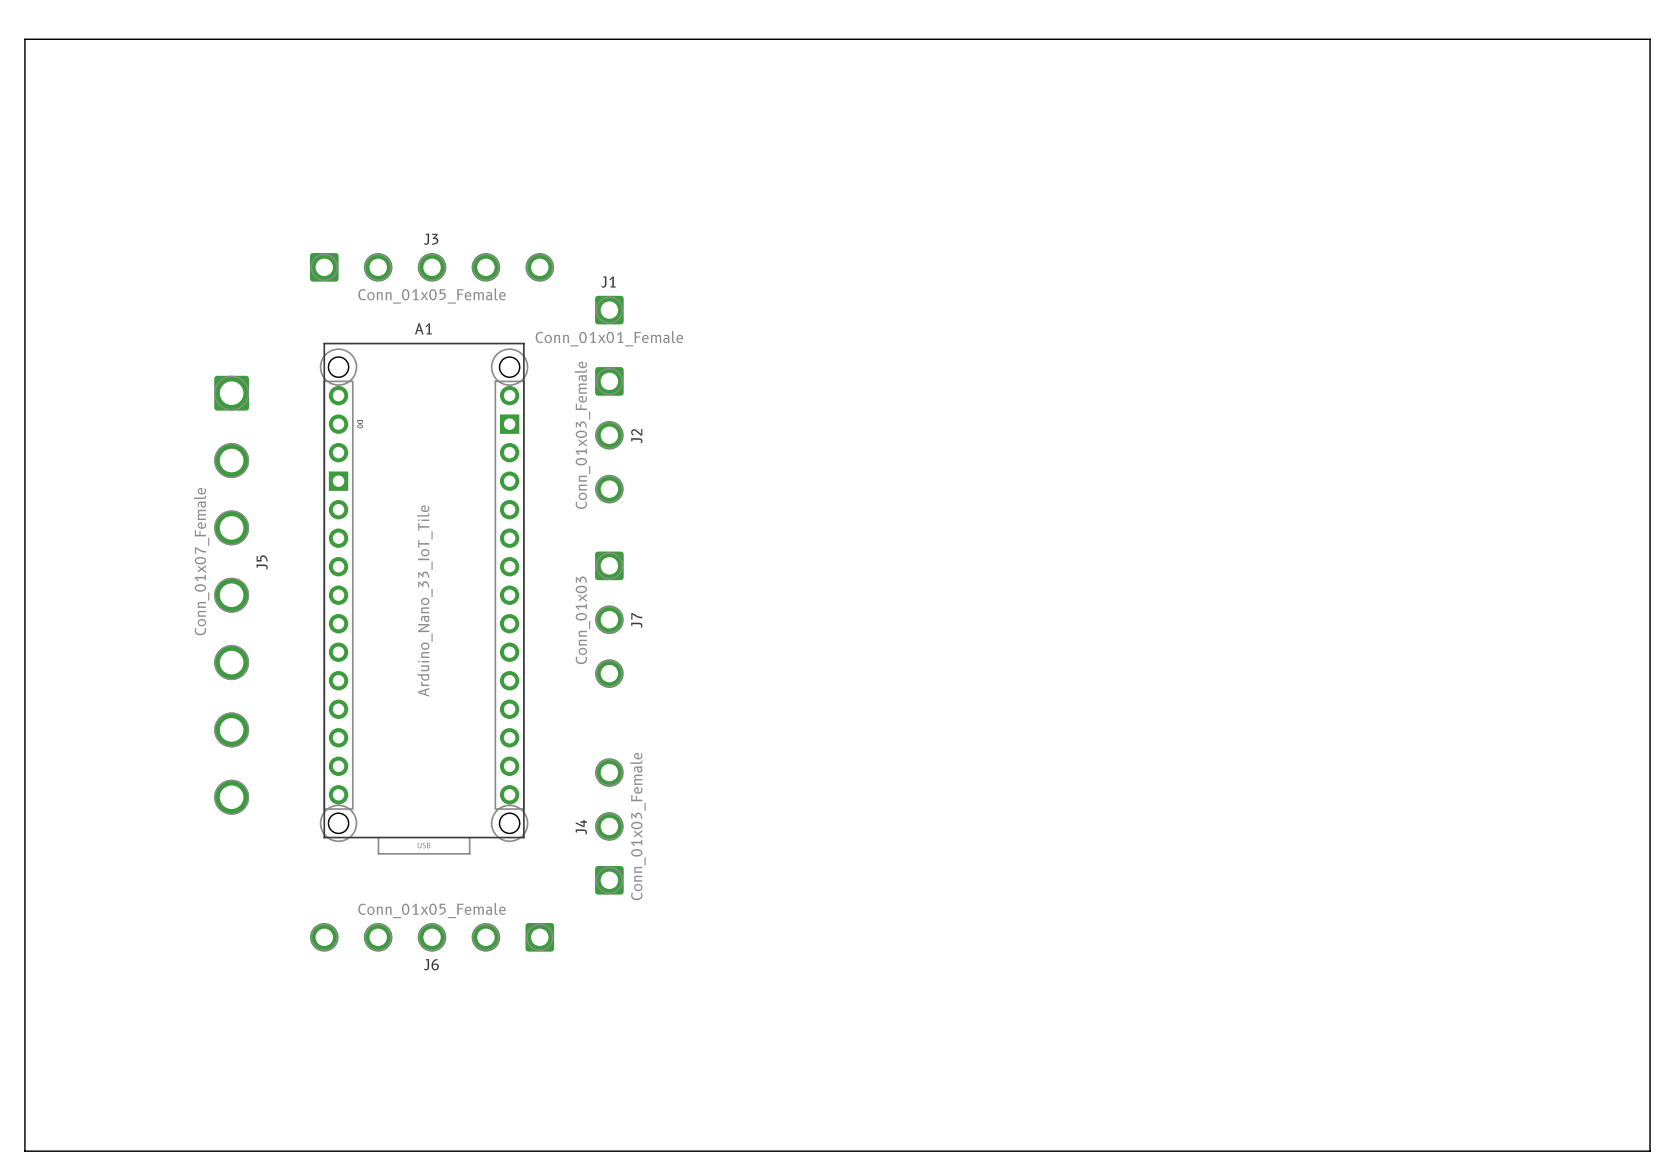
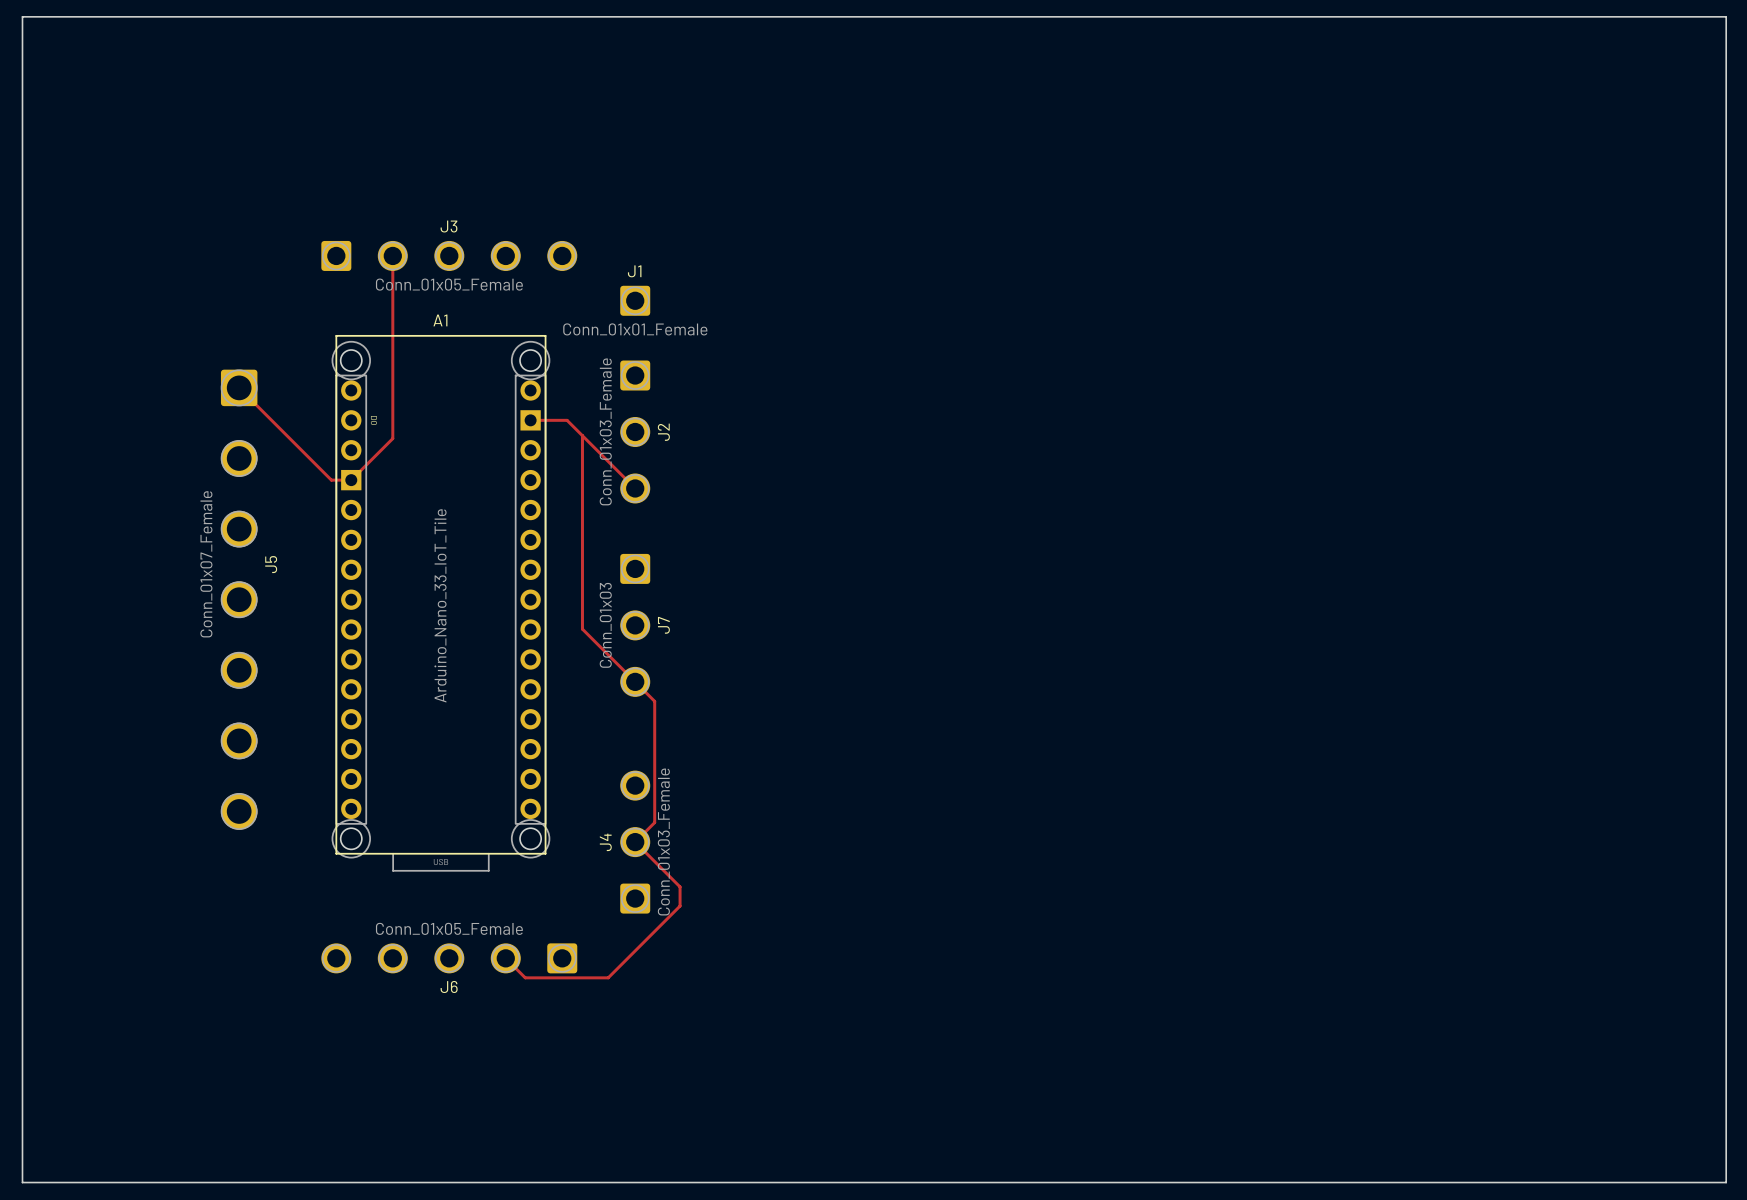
top track: none -> (392, 255) (392, 438) (351, 480) (331, 480) (239, 387)
top track: none -> (530, 420) (567, 420) (635, 488)
top track: none -> (582, 435) (582, 629) (654, 701) (654, 822) (635, 842) (680, 886) (680, 906) (608, 977) (525, 977) (505, 958)

